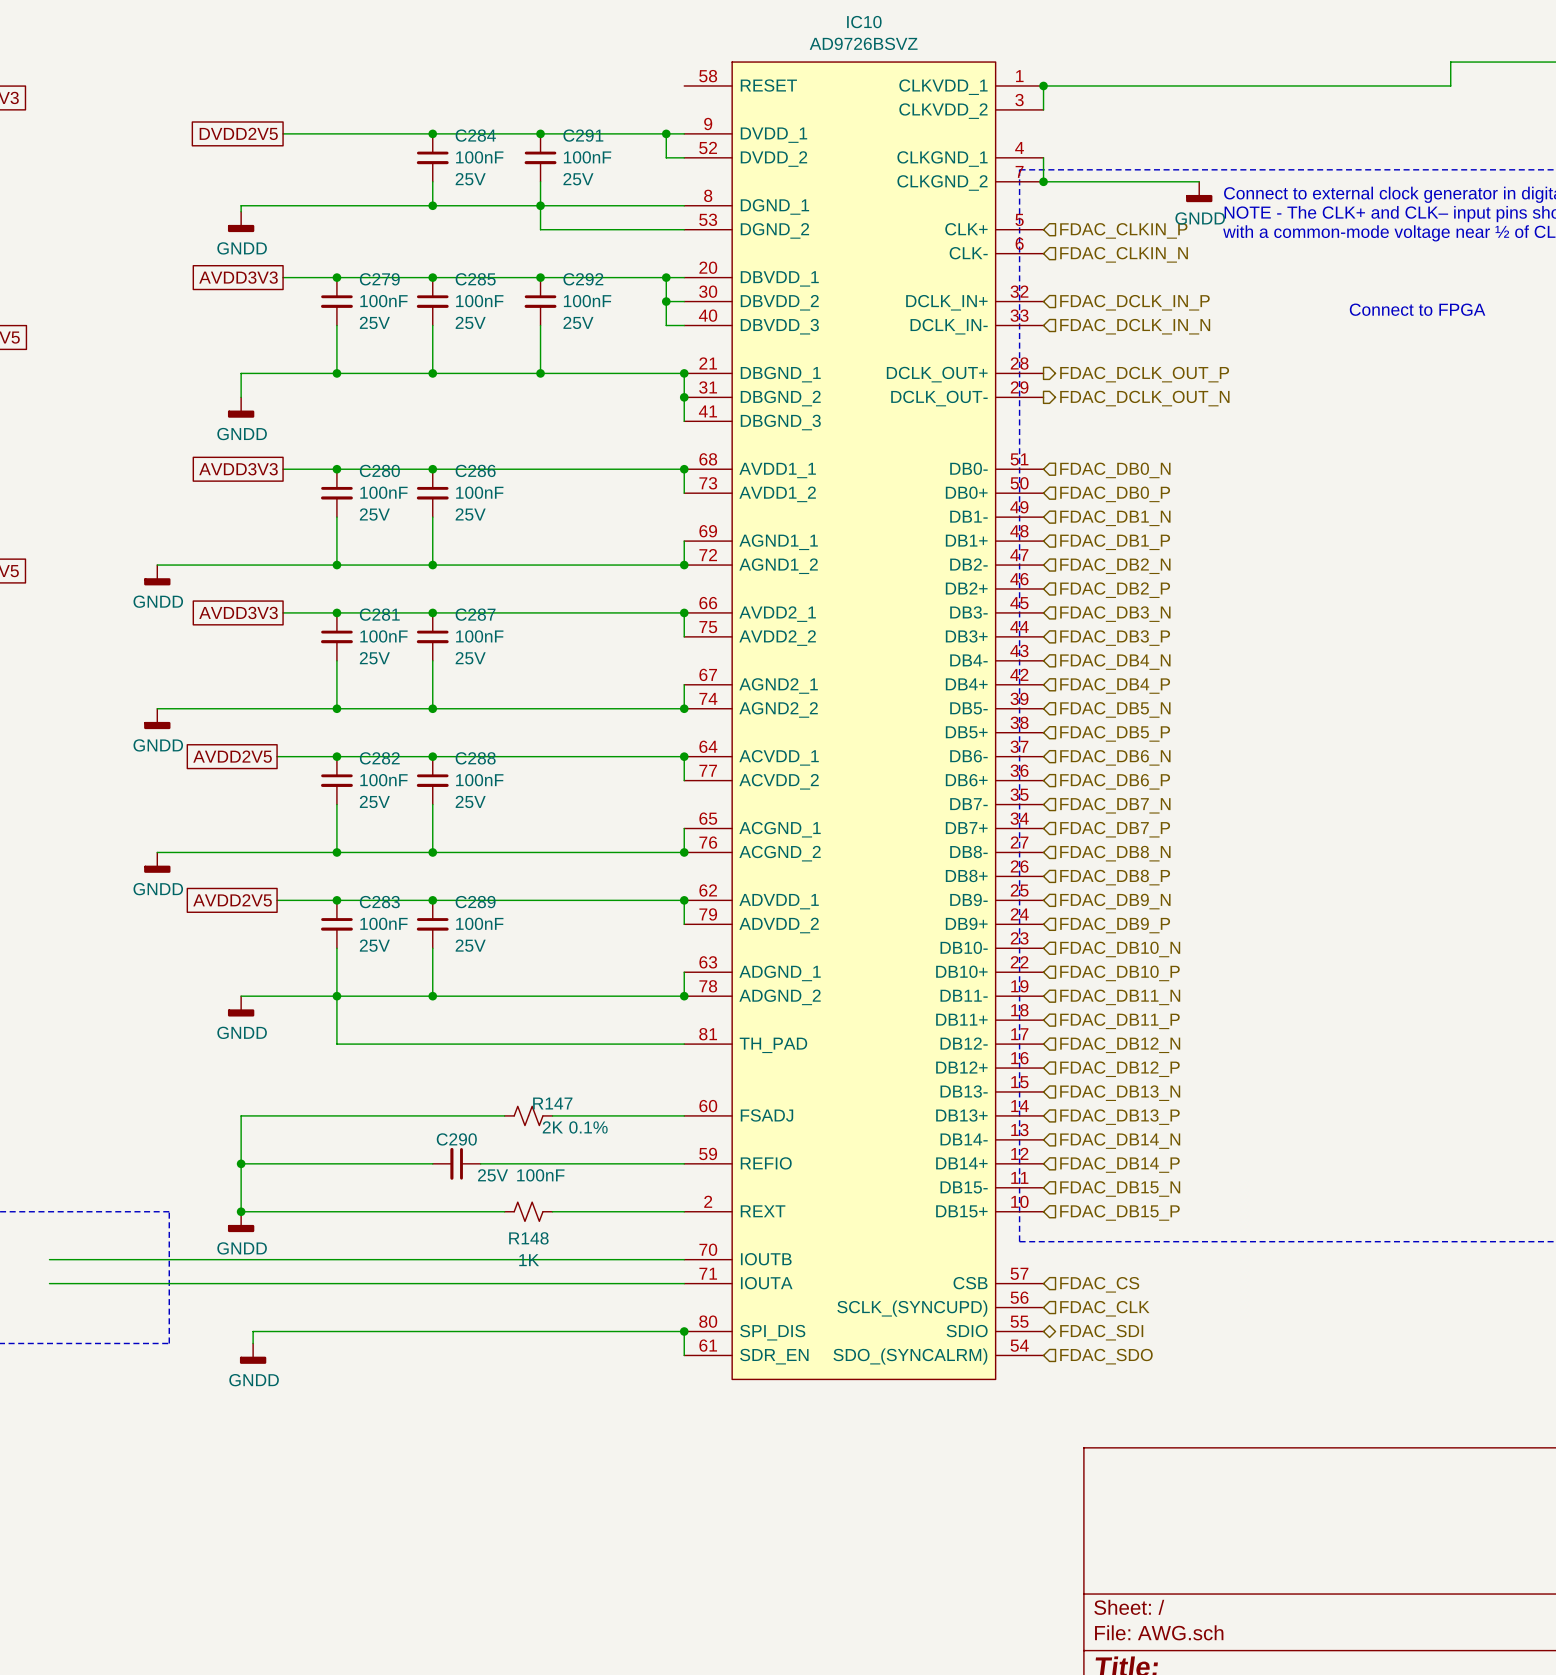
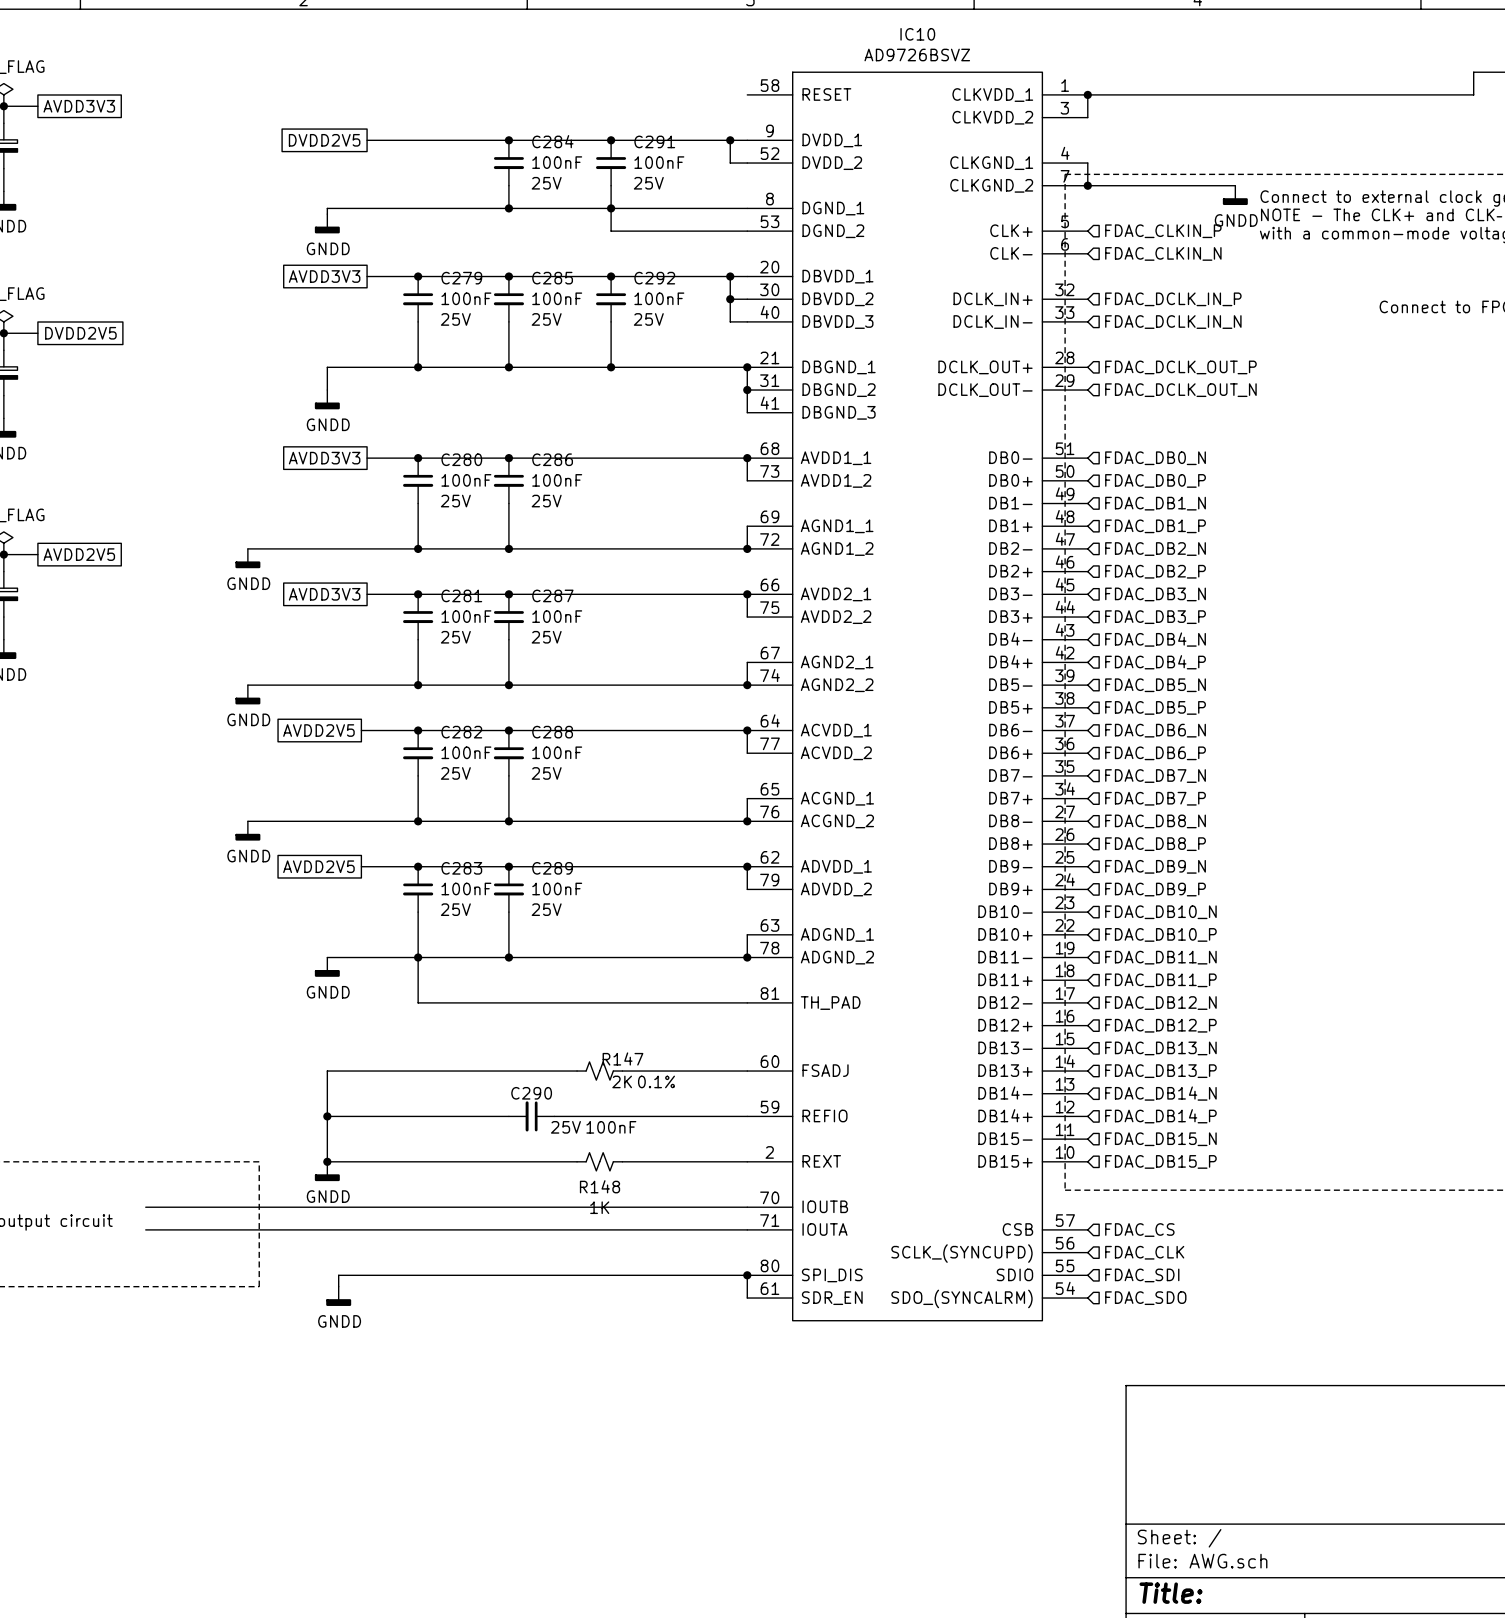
hierarchical label shape: output (1144, 374) -> input (1180, 367)
hierarchical label shape: output (1144, 398) -> input (1180, 390)
hierarchical label shape: bidirectional (1101, 1332) -> input (1142, 1275)

